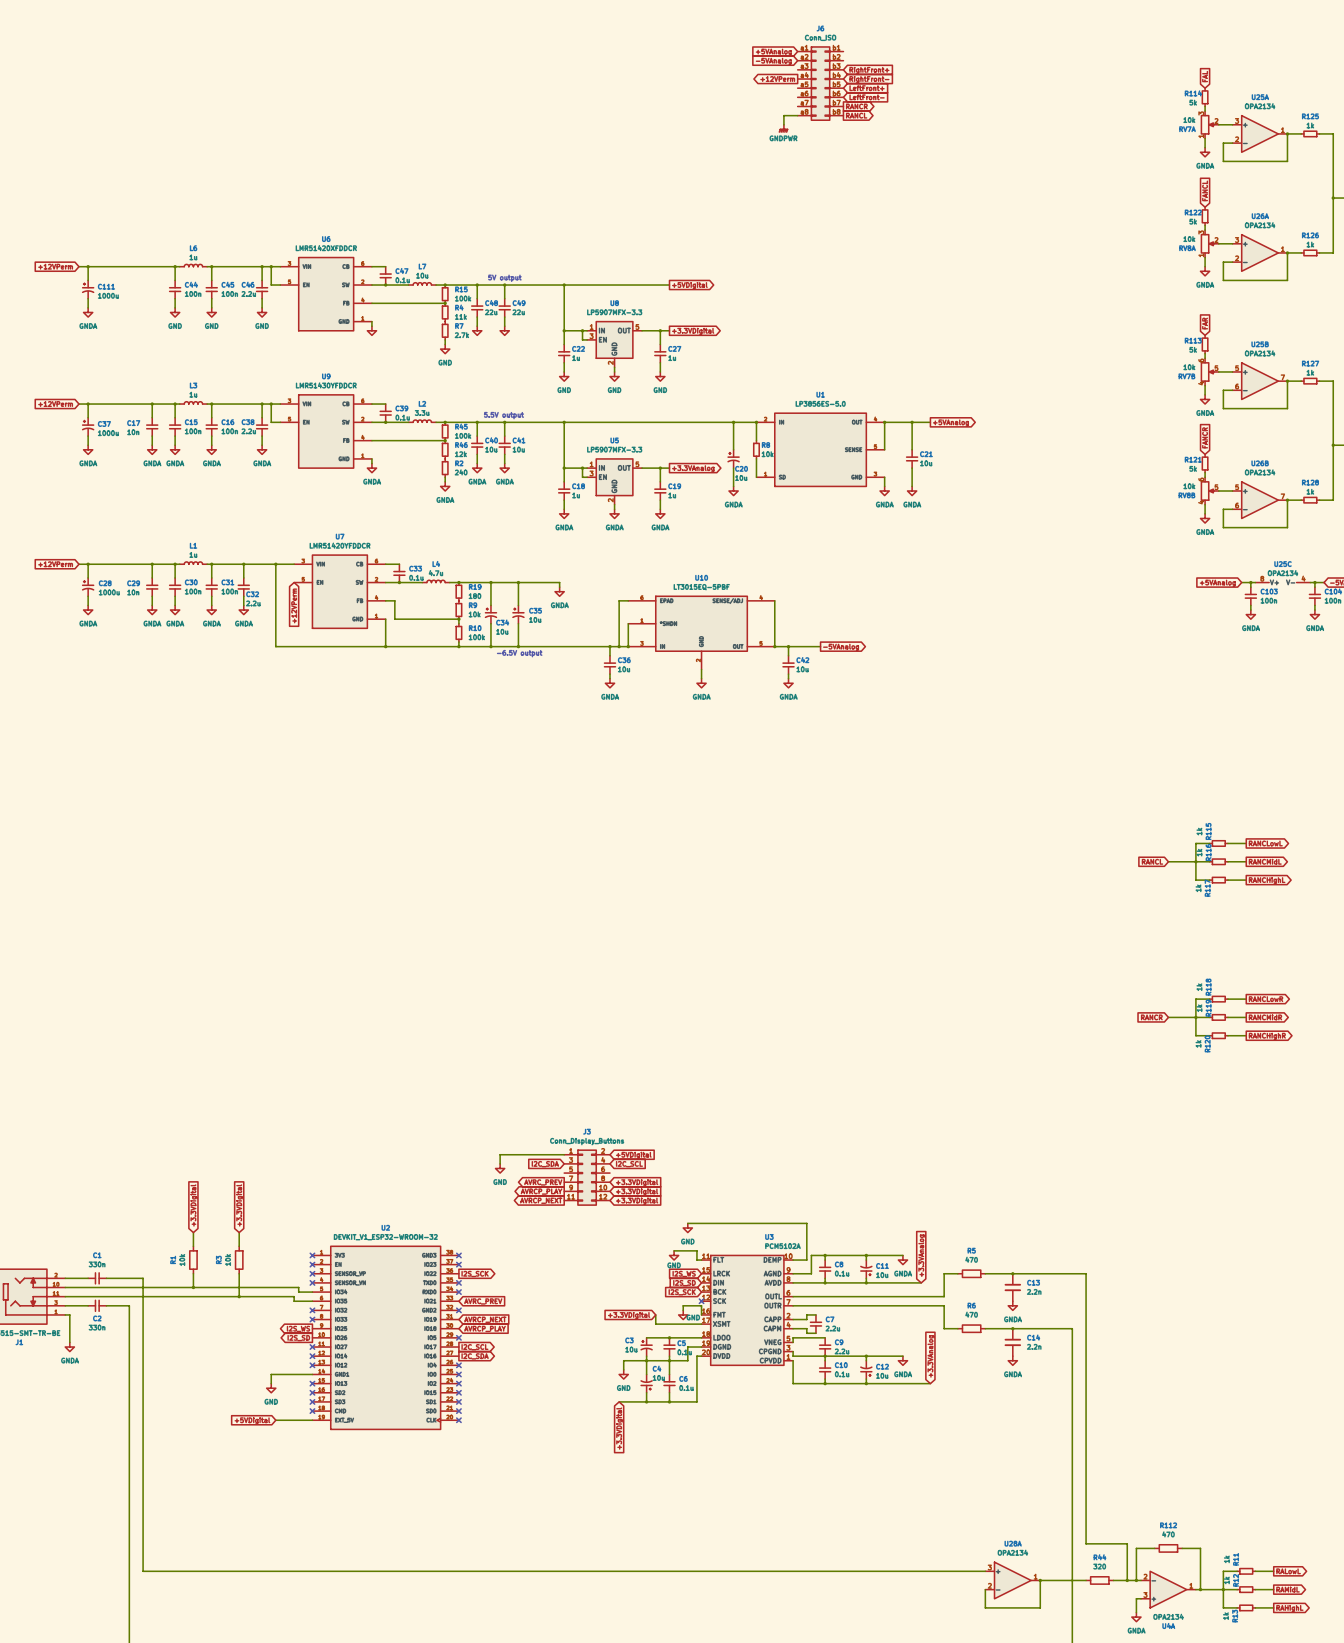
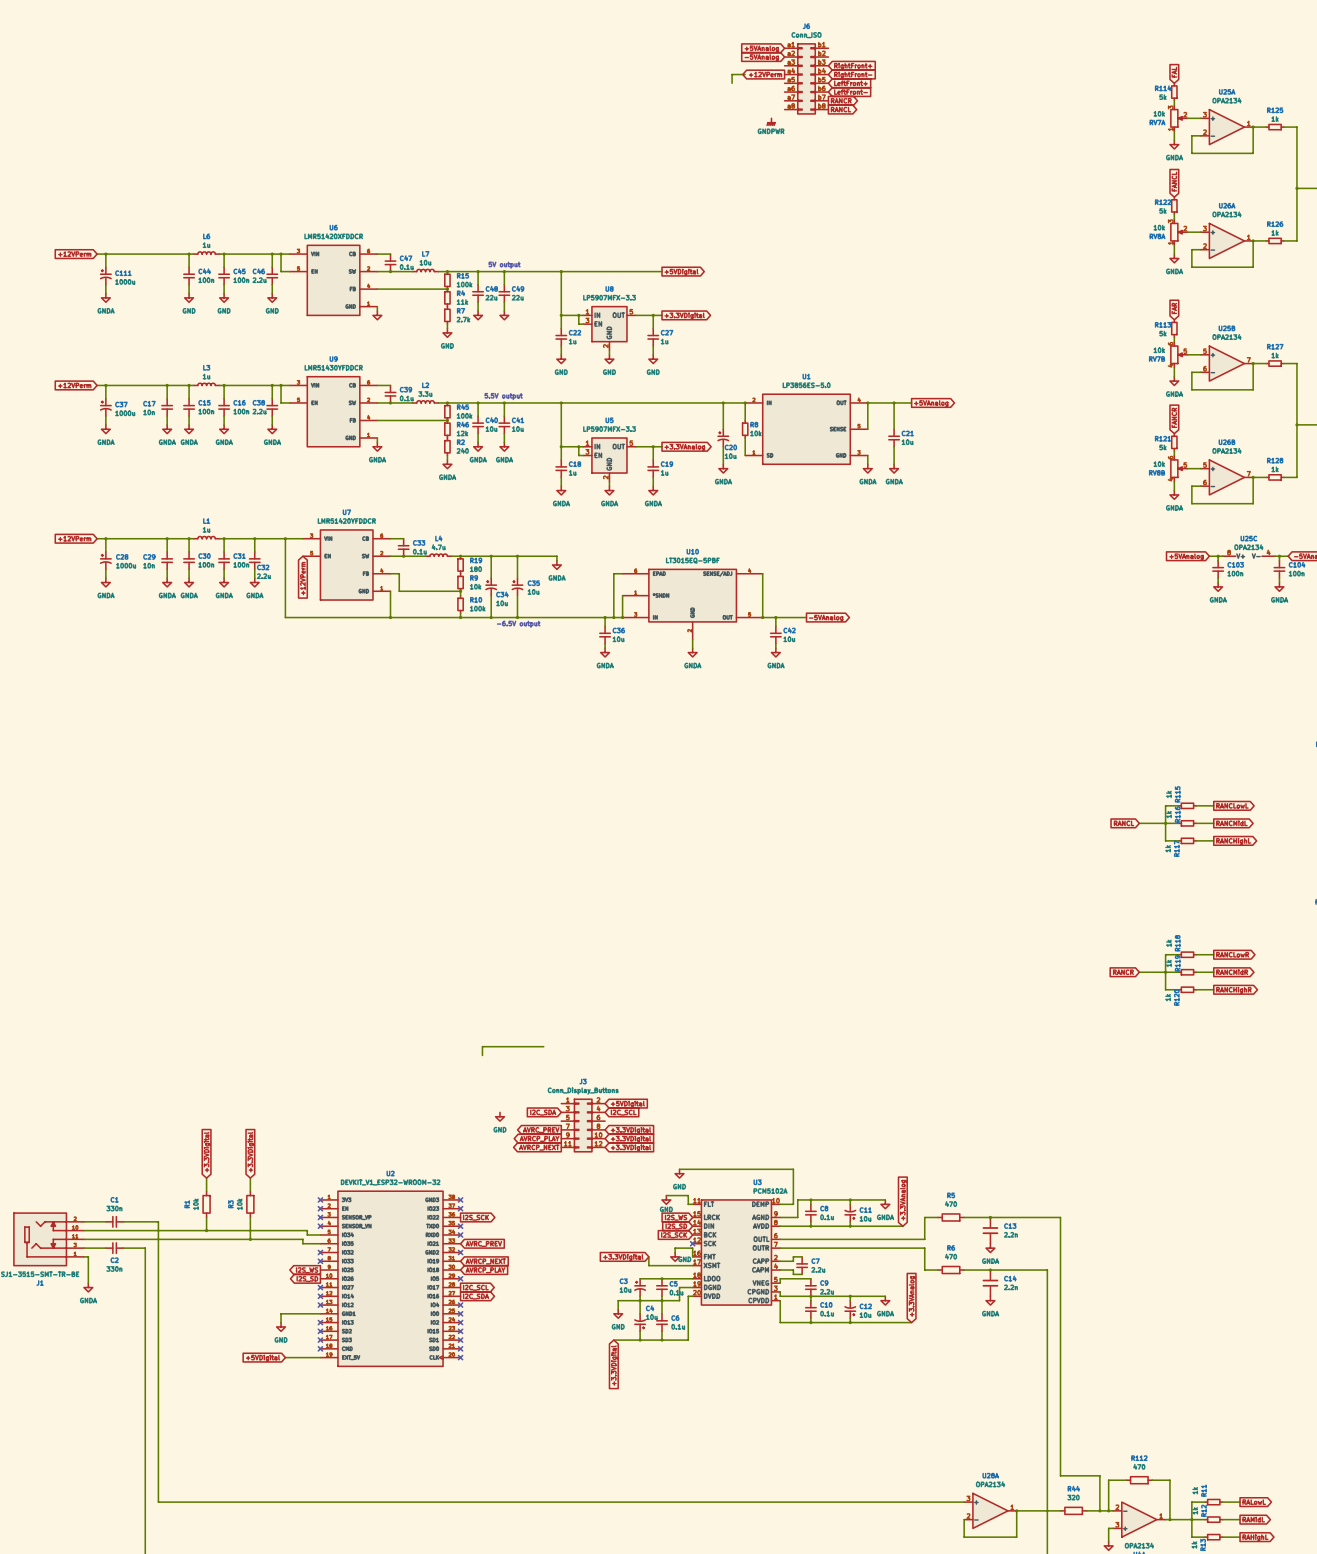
wire: (797, 115) (783, 115) (783, 124) -> (745, 74) (732, 74) (732, 83)
wire: (564, 1154) (500, 1154) (500, 1163) -> (543, 1046) (482, 1046) (482, 1055)

